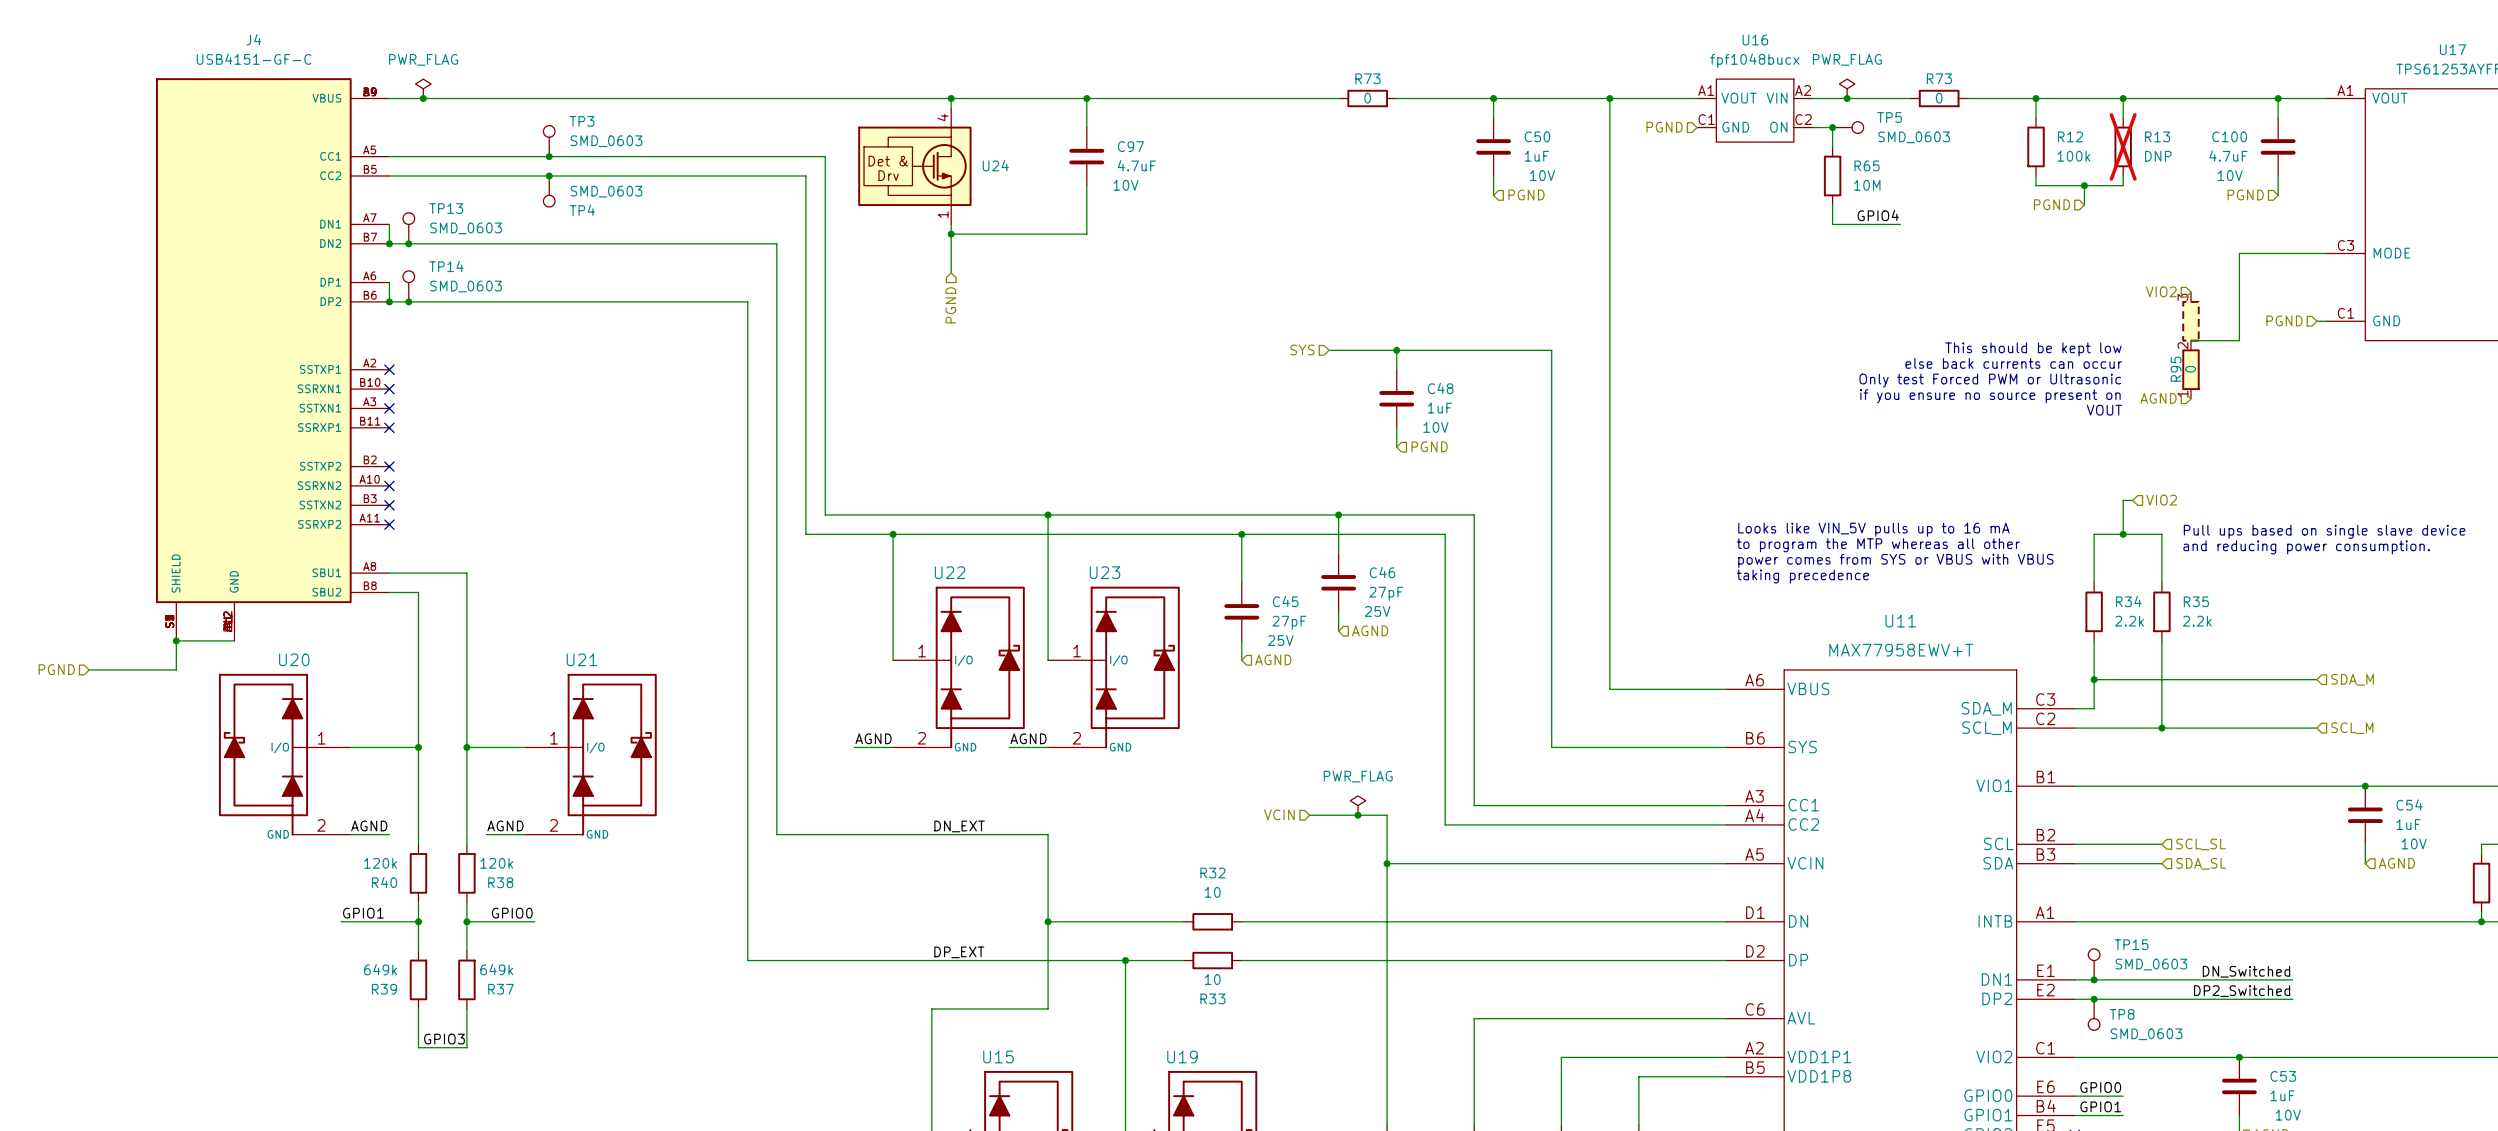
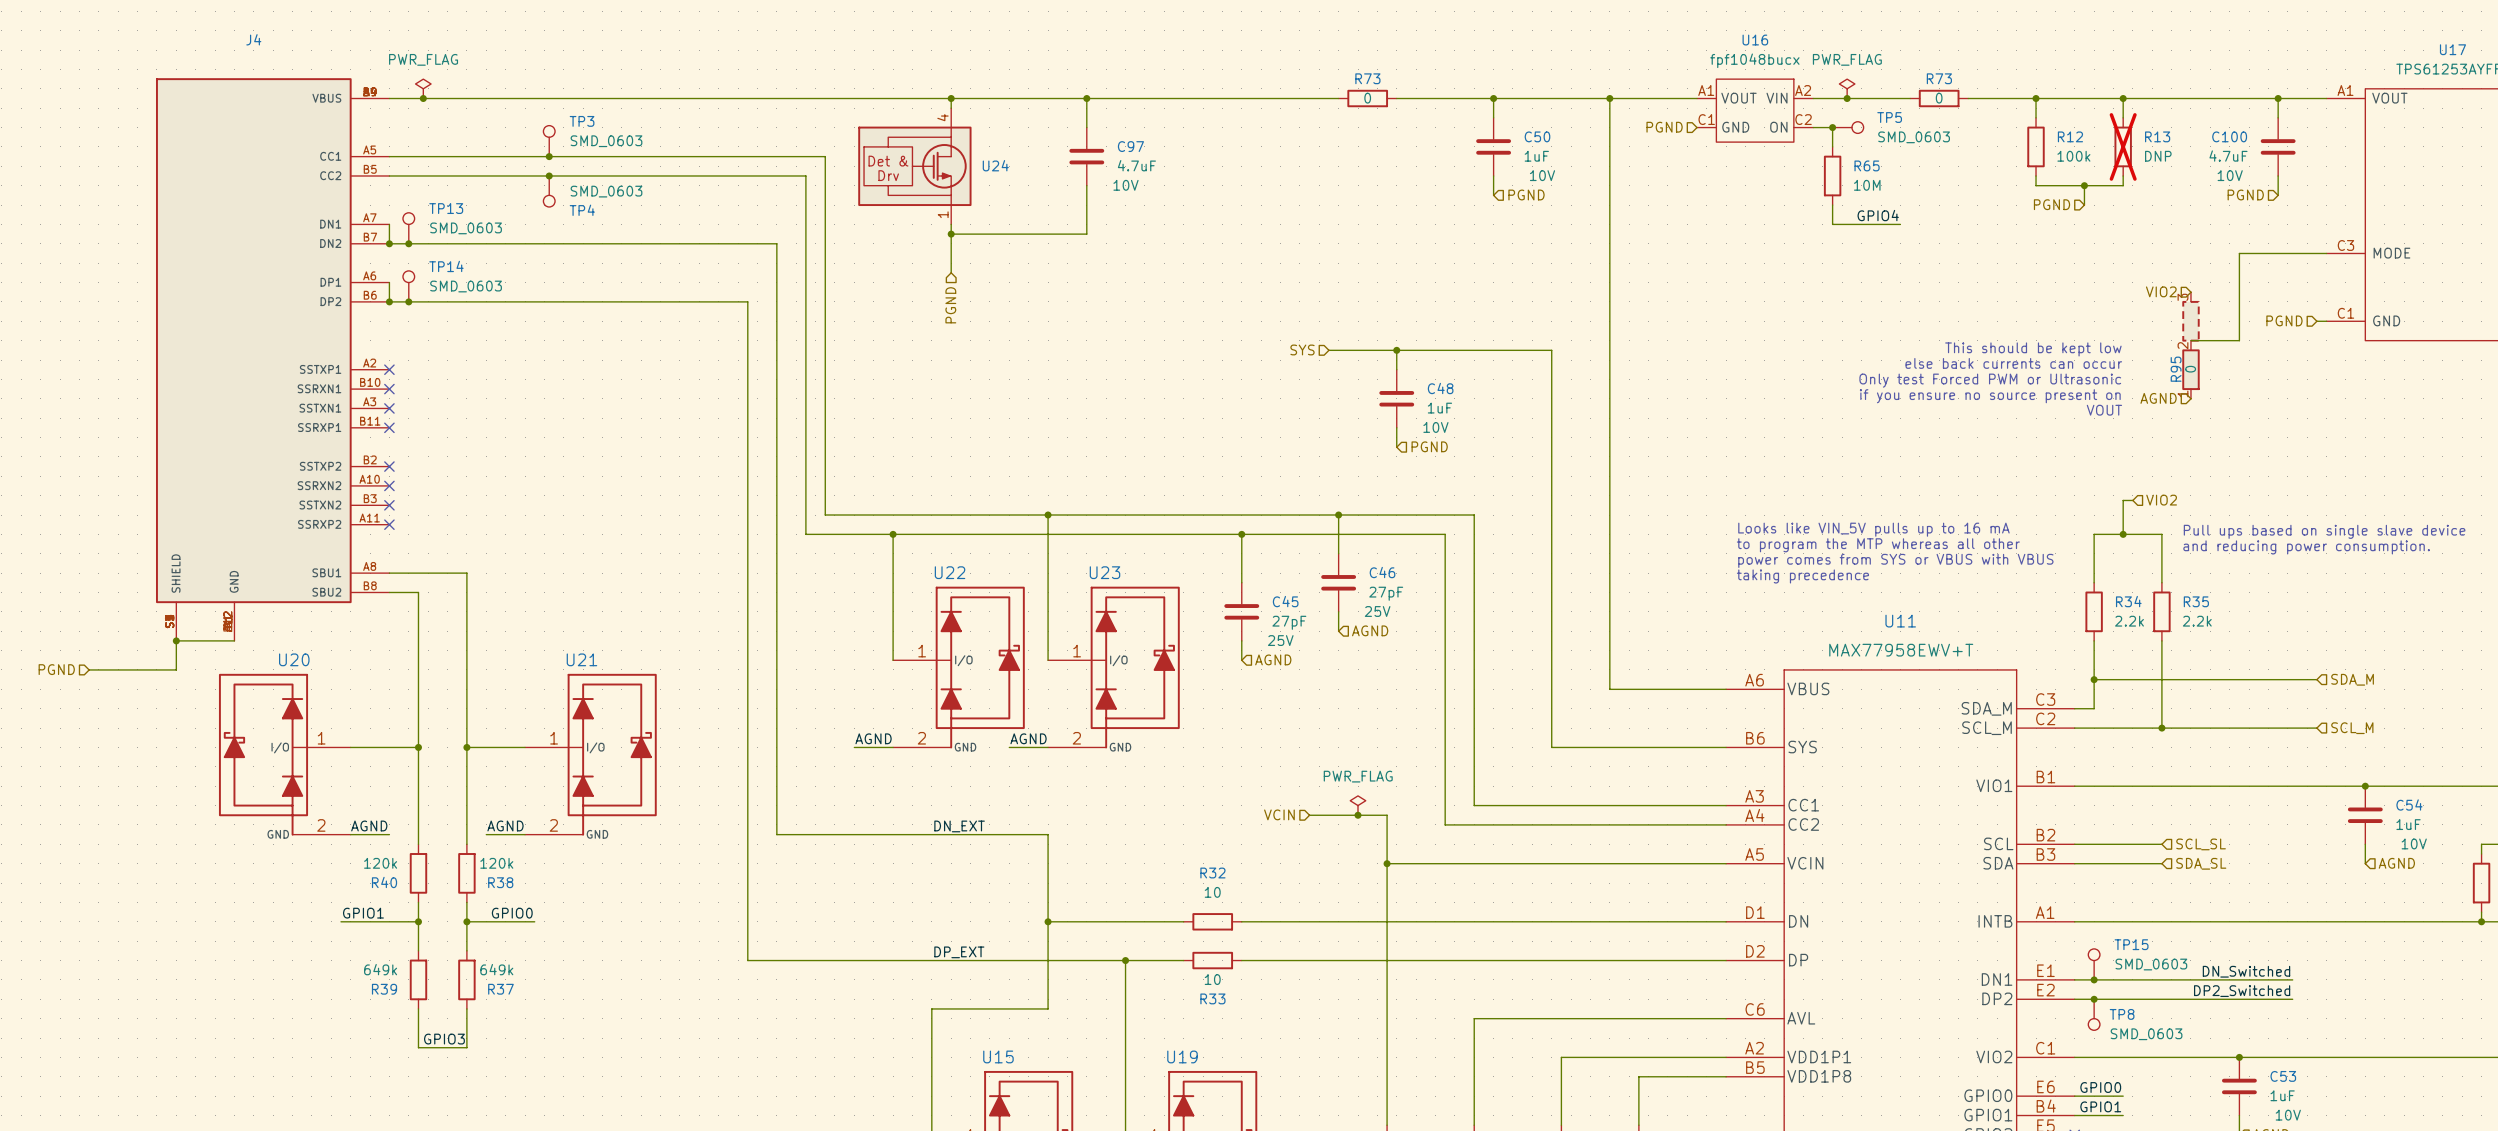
J4 text: USB4151-GF-C (254, 59) -> none

